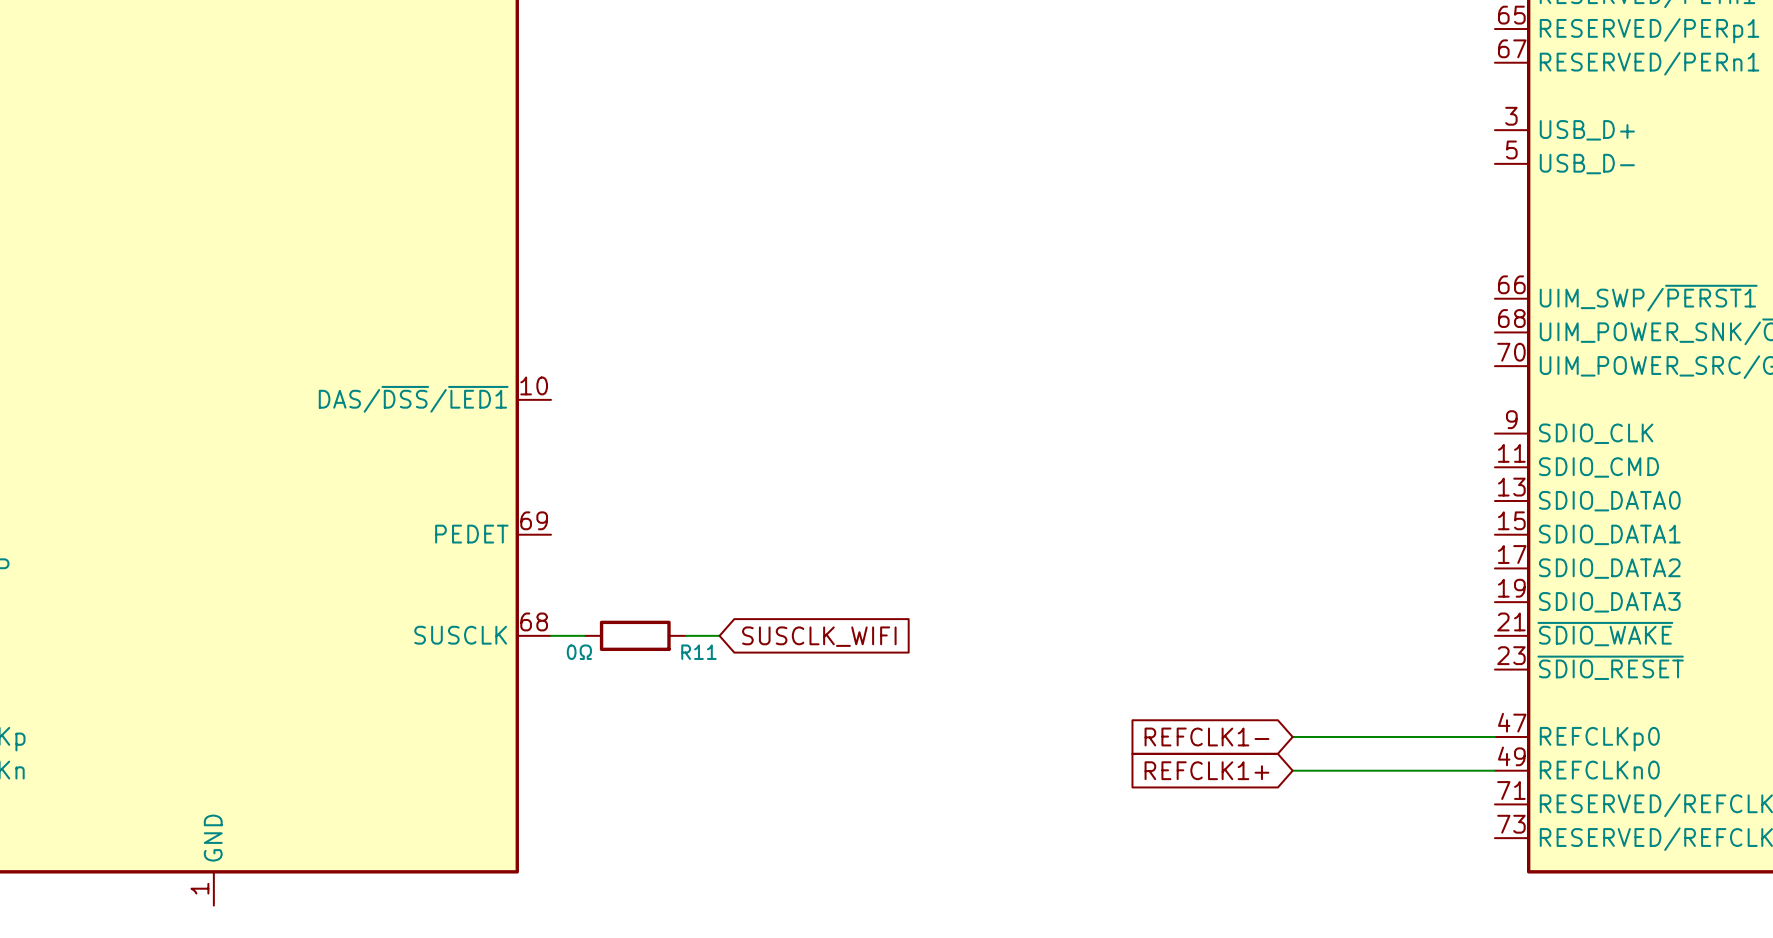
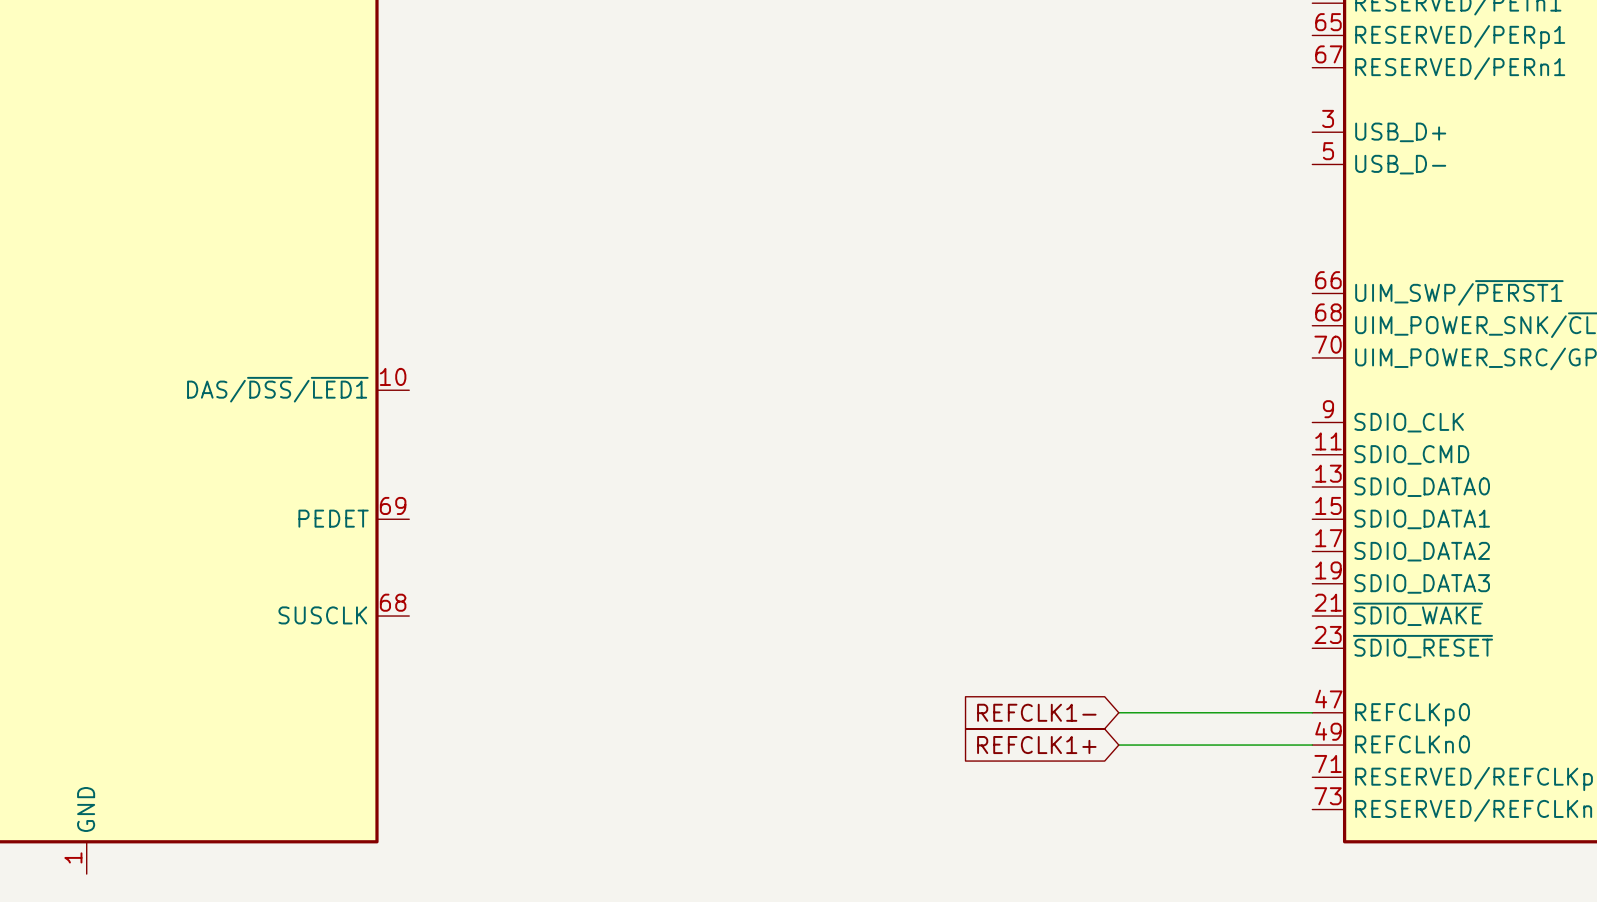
wire: (550, 635) (584, 635) -> none
R11: 0Ω (635, 635) -> none
wire: (685, 635) (719, 635) -> none
global label: SUSCLK_WIFI (819, 636) -> none

